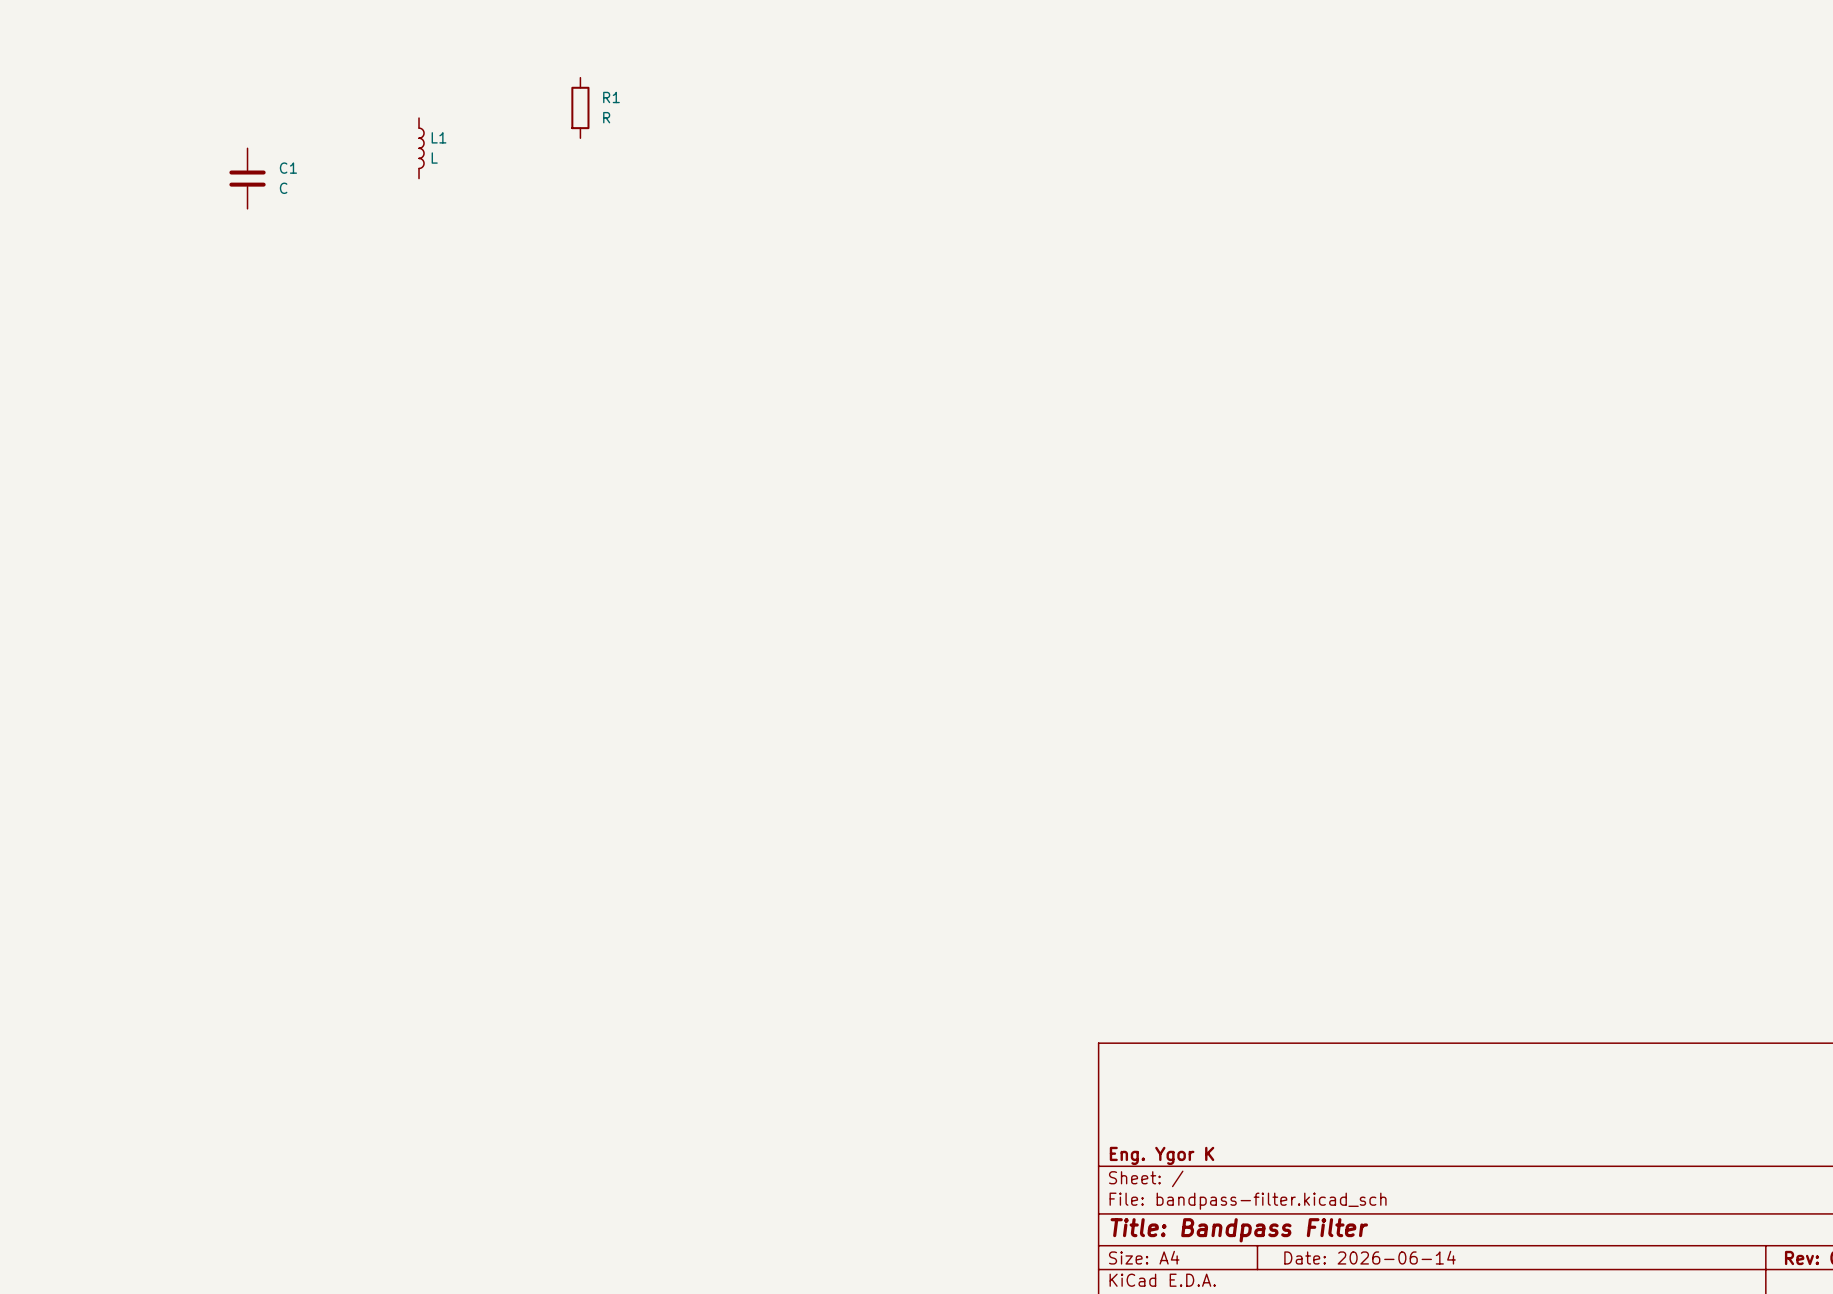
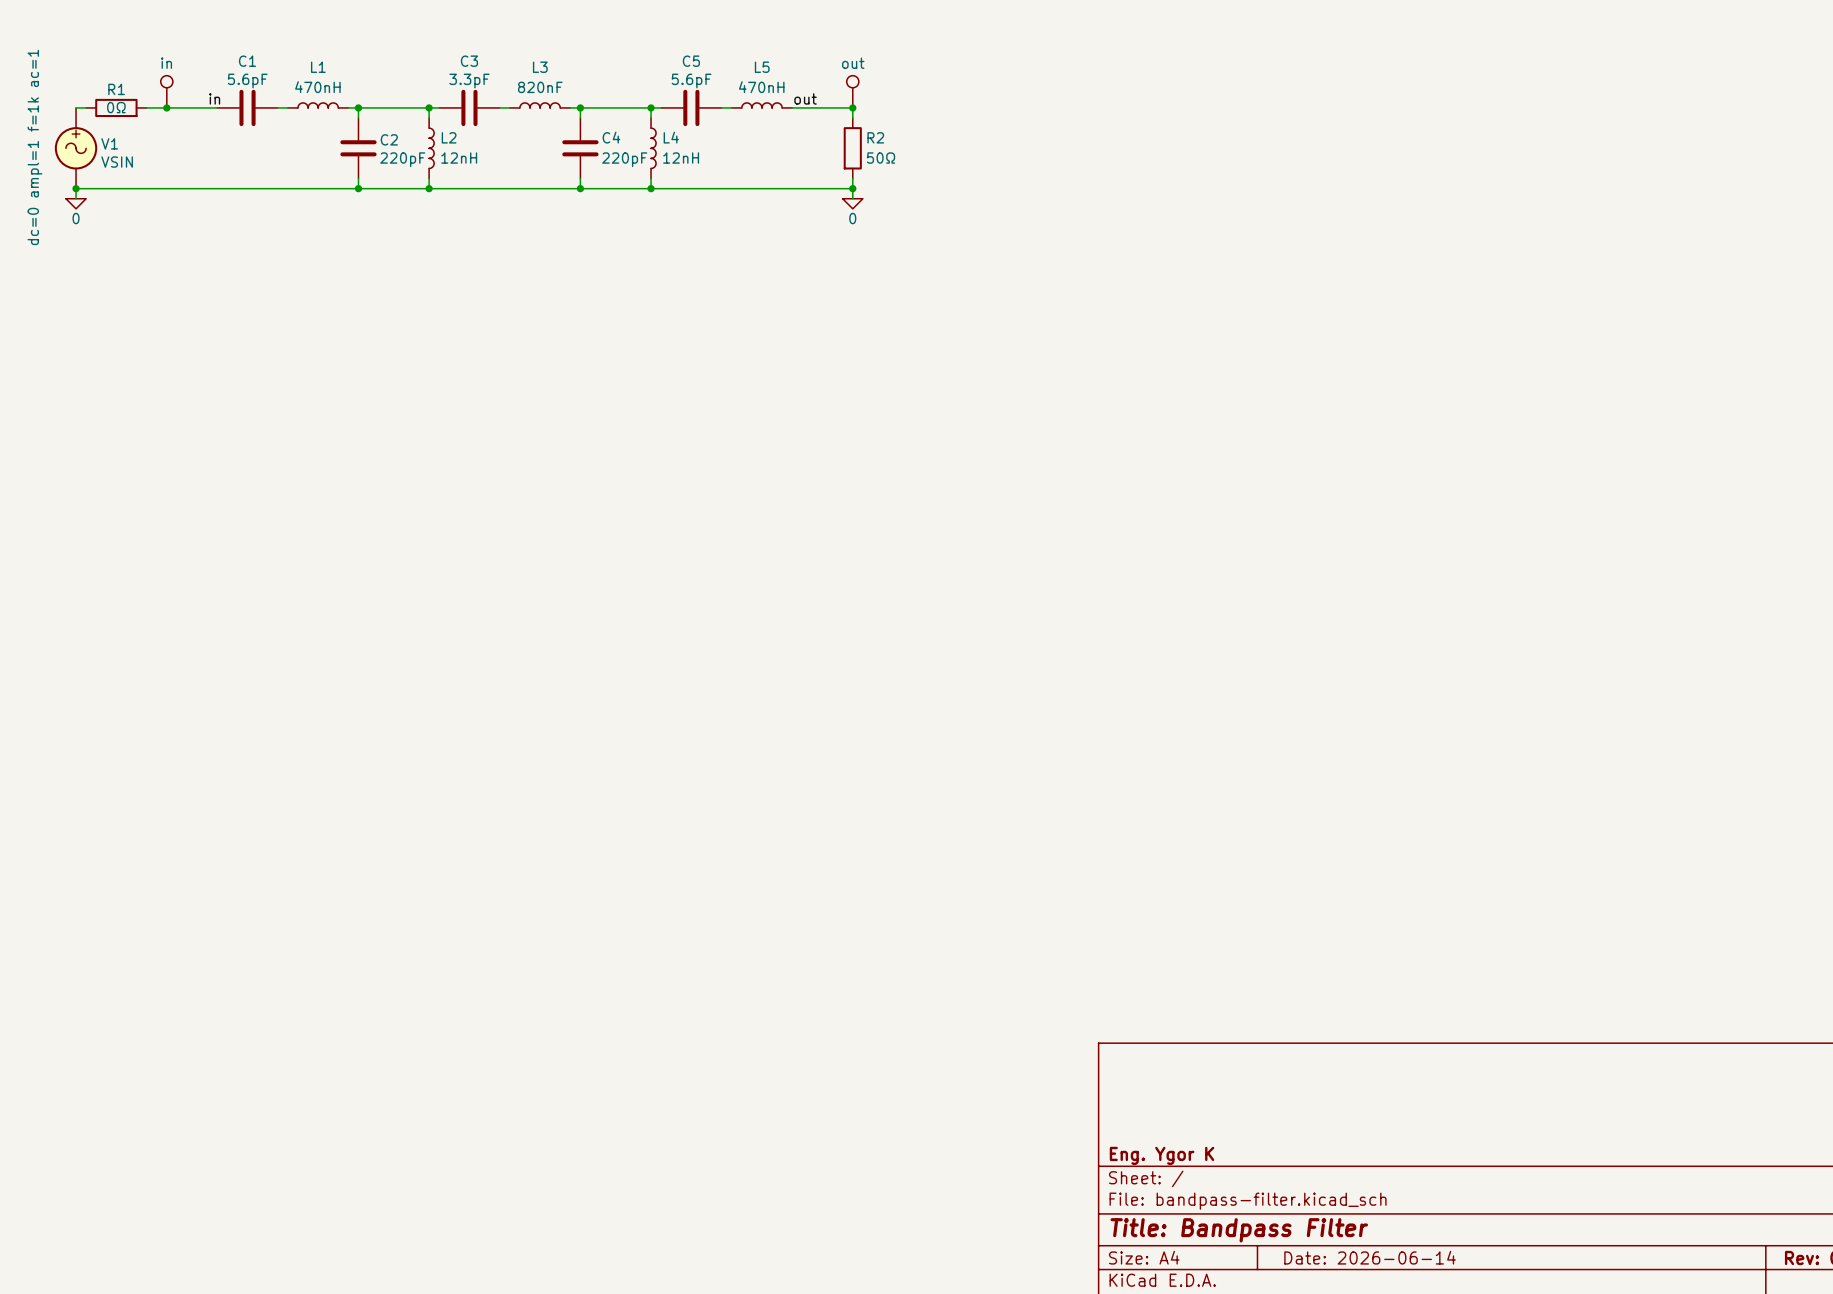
part: none -> in (166, 91)
part: none -> out (852, 91)
R1 name position: R1 (611, 97) -> R1 (116, 89)
label: none -> in (214, 98)
label: none -> out (805, 98)
L3: none -> 820nF (540, 105)
L5: none -> 470nH (761, 105)
wire: none -> (76, 107) (86, 107)
wire: none -> (146, 107) (217, 107)
junction: none -> (166, 107)
wire: none -> (277, 107) (287, 107)
wire: none -> (348, 107) (439, 107)
wire: none -> (358, 107) (358, 118)
junction: none -> (358, 107)
wire: none -> (429, 107) (429, 118)
junction: none -> (429, 107)
C3: none -> 3.3pF (469, 107)
wire: none -> (499, 107) (509, 107)
wire: none -> (570, 107) (661, 107)
wire: none -> (580, 107) (580, 118)
R1 rotation: 0° (580, 107) -> 90° clockwise (116, 107)
R1 position: (580, 107) -> (116, 107)
junction: none -> (580, 107)
wire: none -> (651, 107) (651, 118)
junction: none -> (651, 107)
C5: none -> 5.6pF (691, 107)
wire: none -> (721, 107) (731, 107)
wire: none -> (792, 107) (852, 107) (852, 118)
junction: none -> (852, 107)
R1 value: R (606, 117) -> 0Ω (116, 107)
L1 name position: L1 (439, 137) -> L1 (318, 67)
V1: none -> VSIN (76, 148)
C2: none -> 220pF (358, 148)
L1 rotation: 0° (421, 148) -> 90° counterclockwise (318, 105)
L1 position: (421, 148) -> (318, 105)
L2: none -> 12nH (431, 148)
C4: none -> 220pF (580, 148)
L4: none -> 12nH (653, 148)
R2: none -> 50Ω (852, 148)
L1 value: L (434, 158) -> 470nH (317, 87)
C1 name position: C1 (288, 168) -> C1 (247, 61)
C1 rotation: 0° (247, 178) -> 90° clockwise (247, 107)
C1 position: (247, 178) -> (247, 107)
wire: none -> (358, 178) (358, 188)
wire: none -> (429, 178) (429, 188)
wire: none -> (580, 178) (580, 188)
wire: none -> (651, 178) (651, 188)
wire: none -> (852, 178) (852, 198)
junction: none -> (76, 188)
C1 value: C (283, 188) -> 5.6pF (247, 81)
junction: none -> (358, 188)
junction: none -> (429, 188)
junction: none -> (580, 188)
junction: none -> (651, 188)
wire: none -> (852, 188) (76, 188) (76, 198)
junction: none -> (852, 188)
power symbol: none -> 0 (76, 203)
power symbol: none -> 0 (852, 203)

